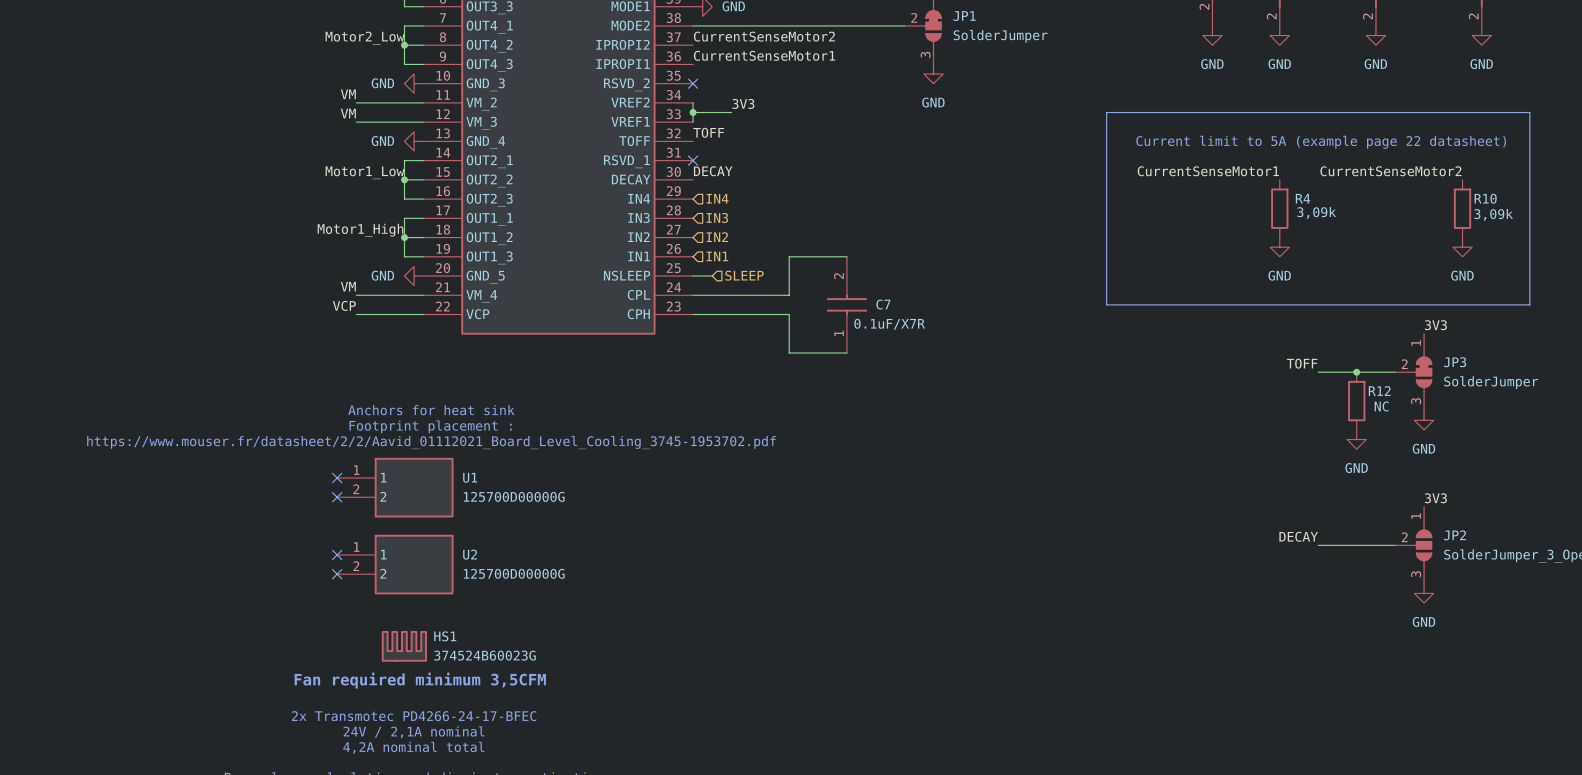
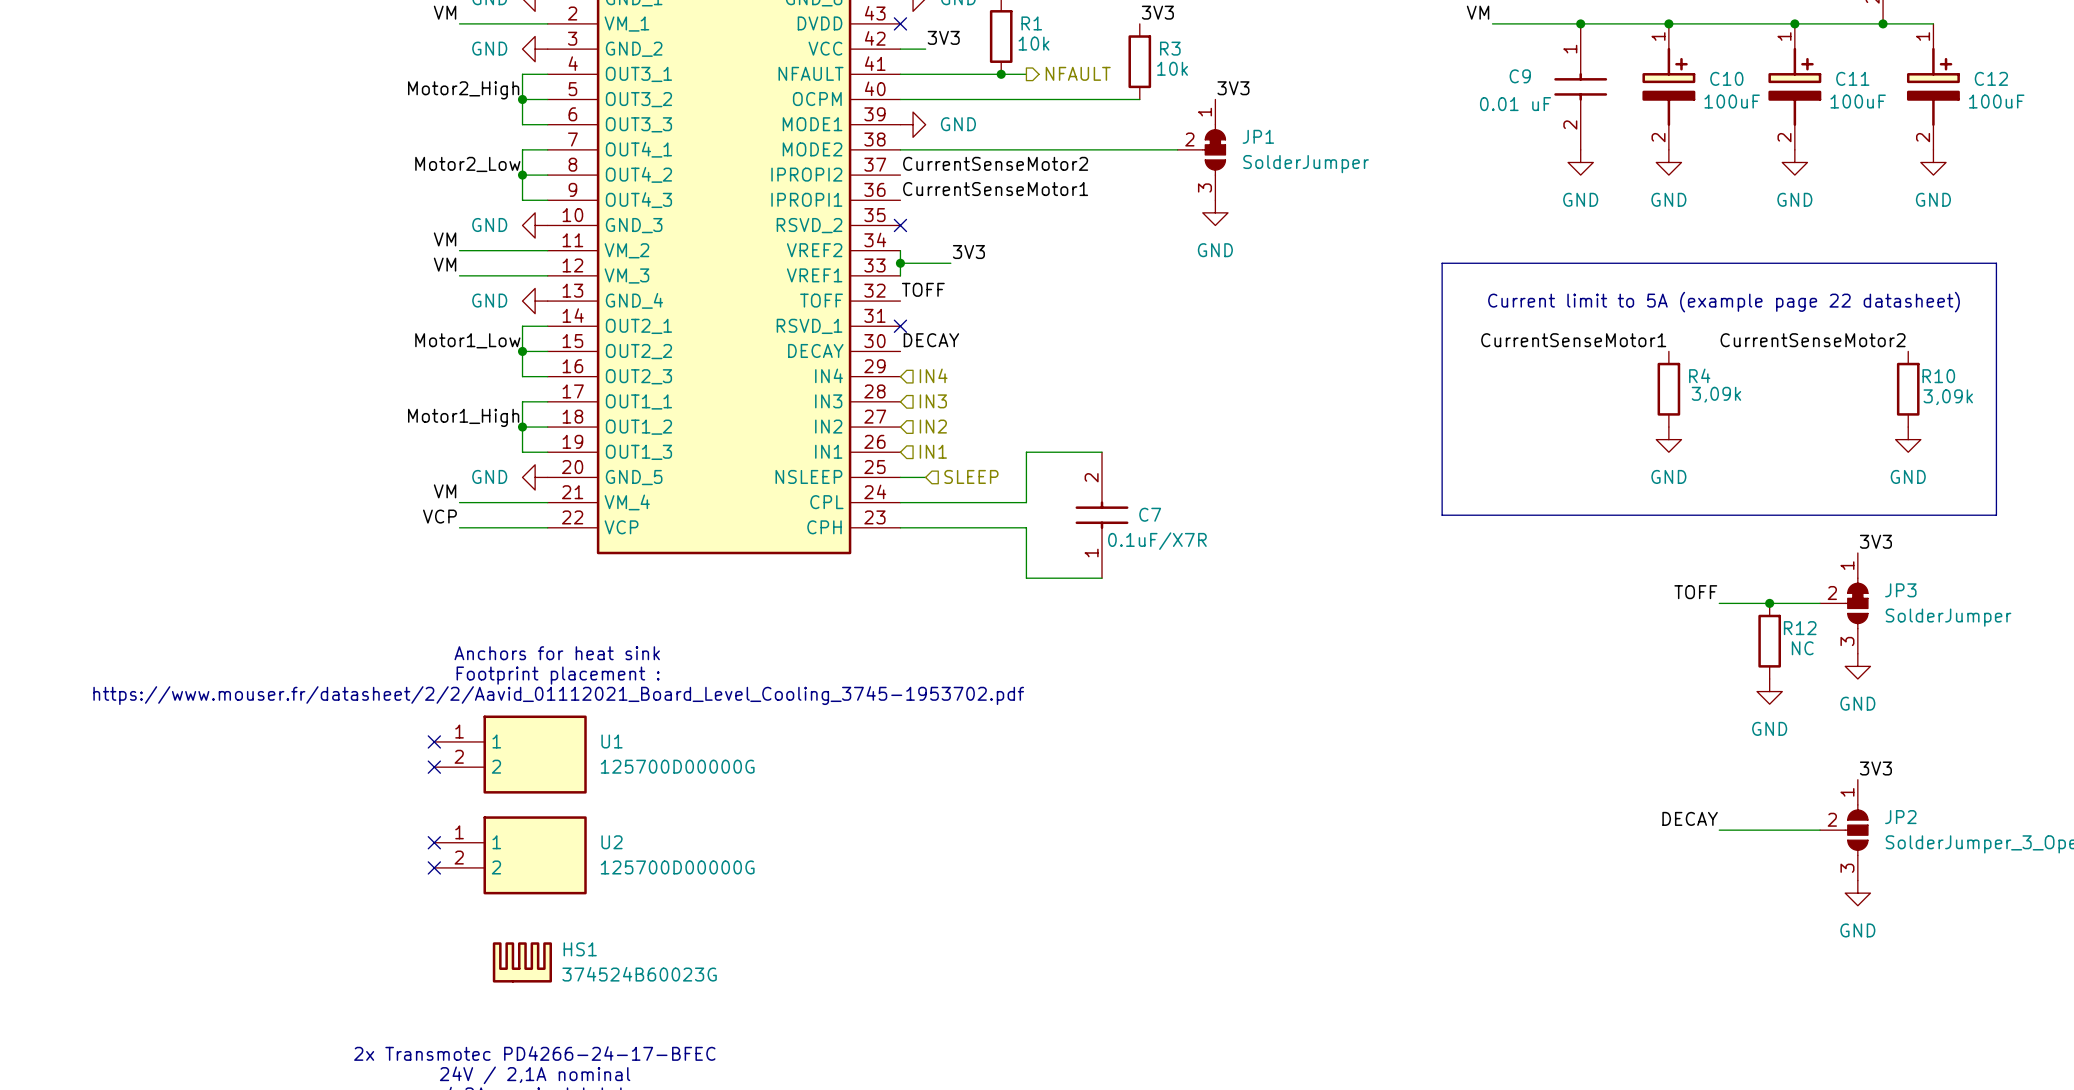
text: Fan required minimum 3,5CFM (420, 680) -> none

